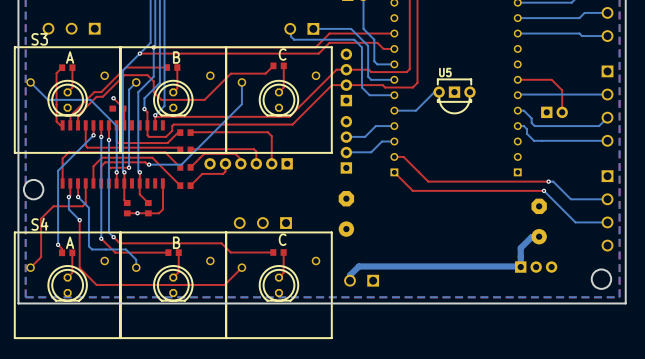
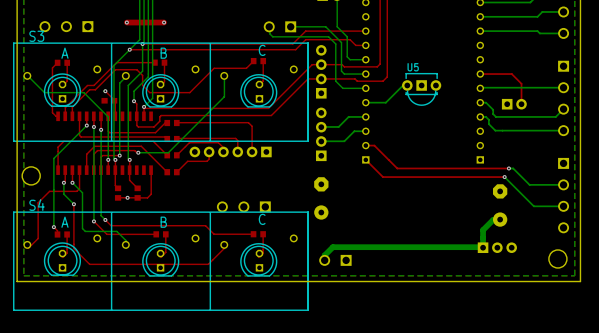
via: none -> (126, 22)
top track: none -> (164, 22) (126, 22)
via: none -> (164, 22)
S3 footprint: [14, 46, 333, 154] -> [13, 42, 309, 142]
S4 footprint: [14, 231, 333, 339] -> [13, 211, 309, 311]

